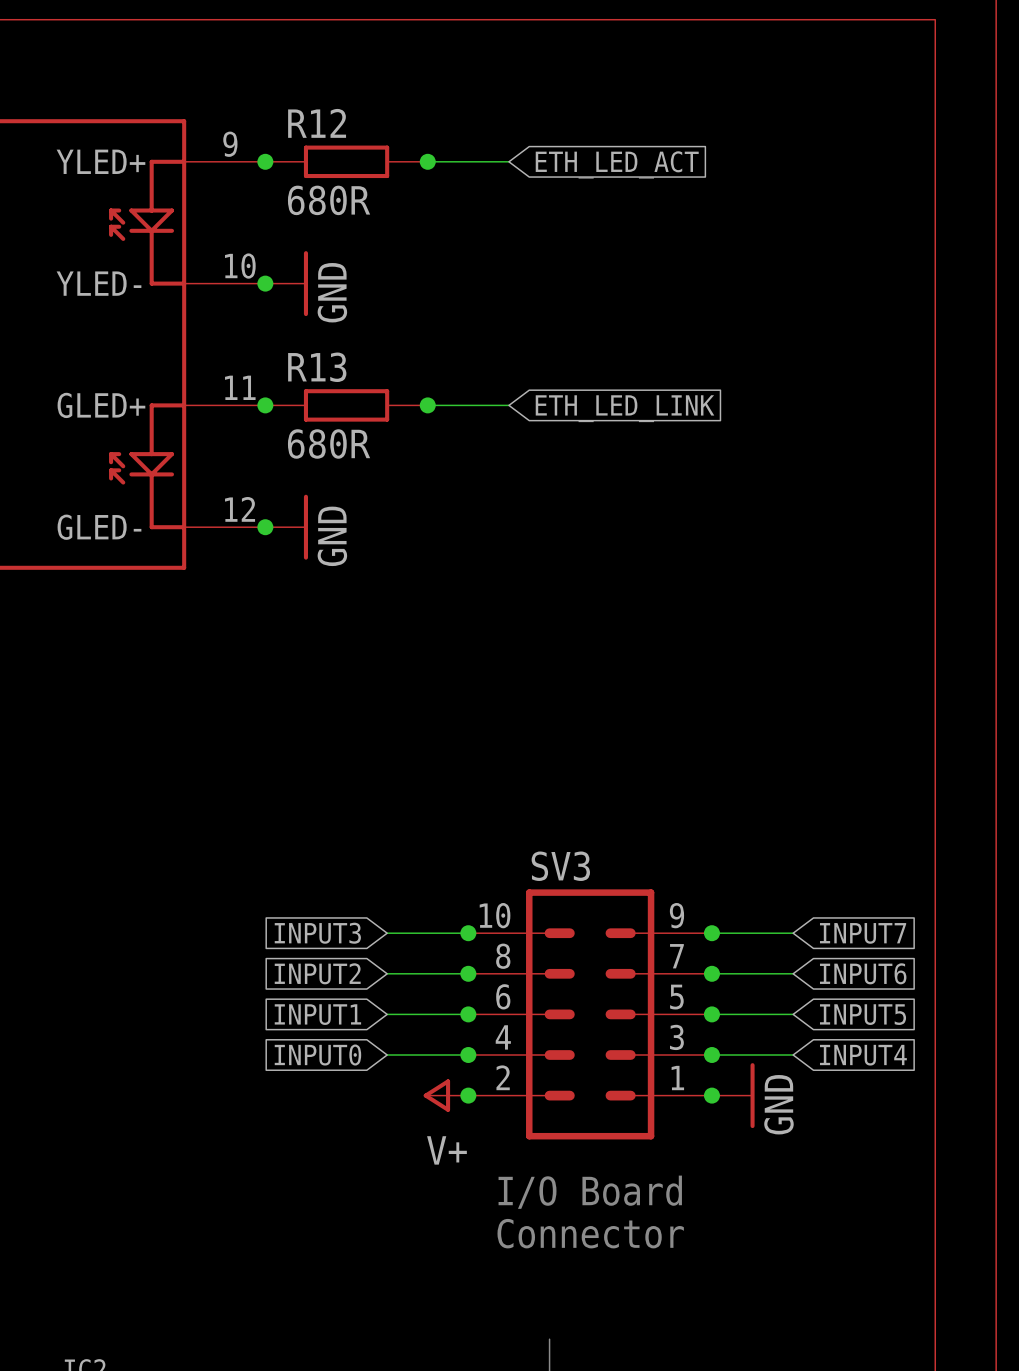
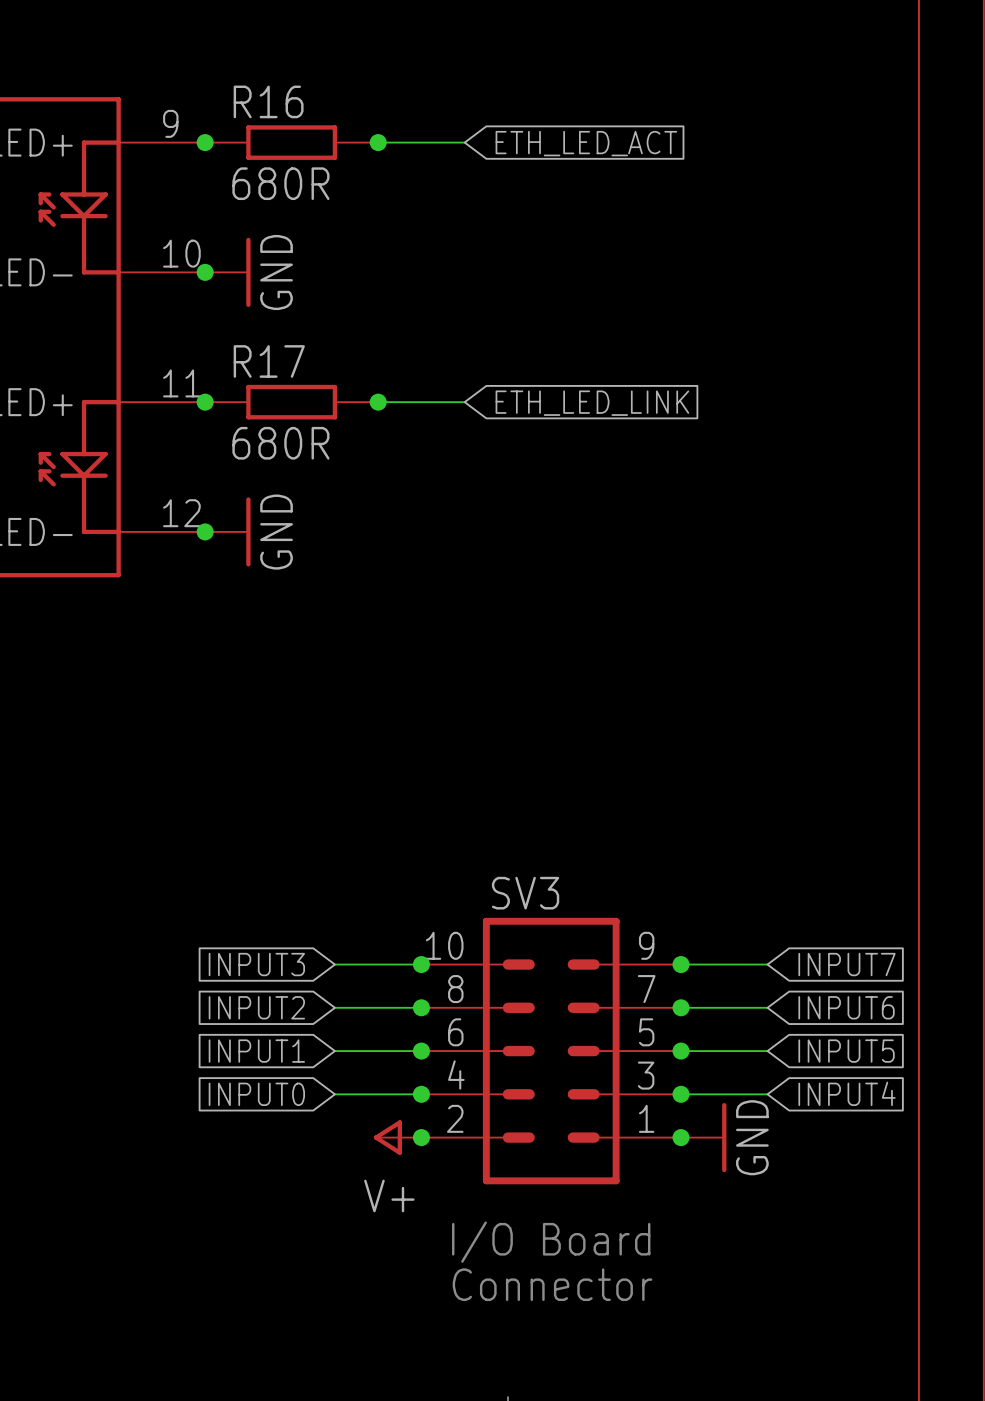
R12 name: R12 (317, 123) -> R16 (268, 101)
R13 name: R13 (317, 367) -> R17 (269, 361)

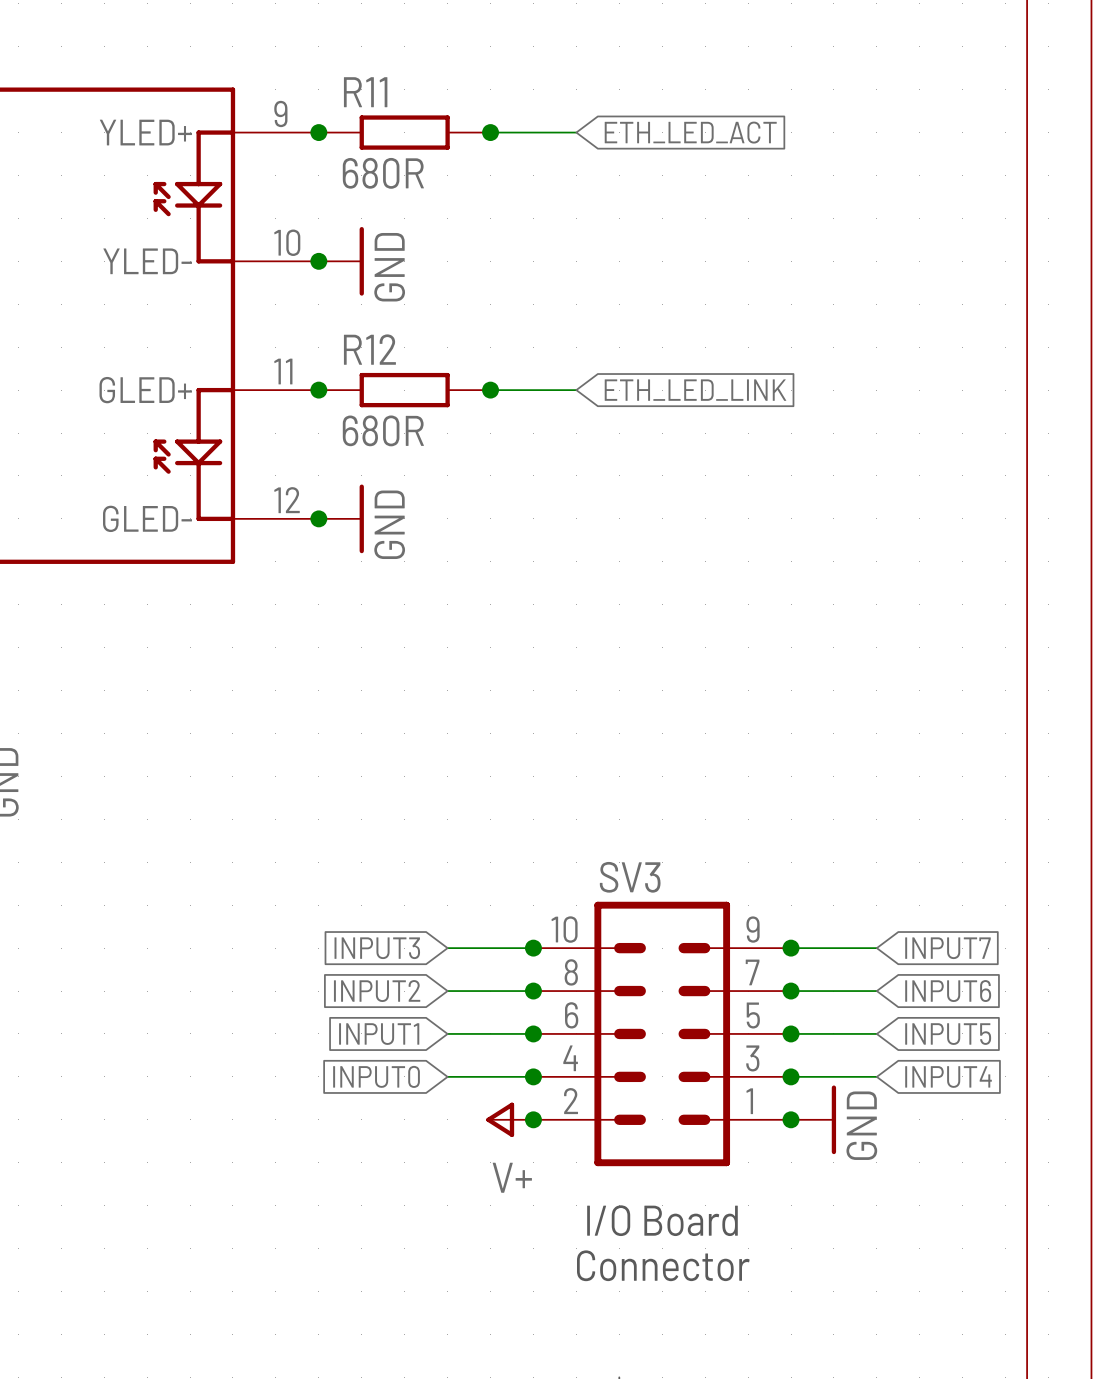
R16 name: R16 (268, 101) -> R11 (365, 92)
R17 name: R17 (269, 361) -> R12 (369, 349)

